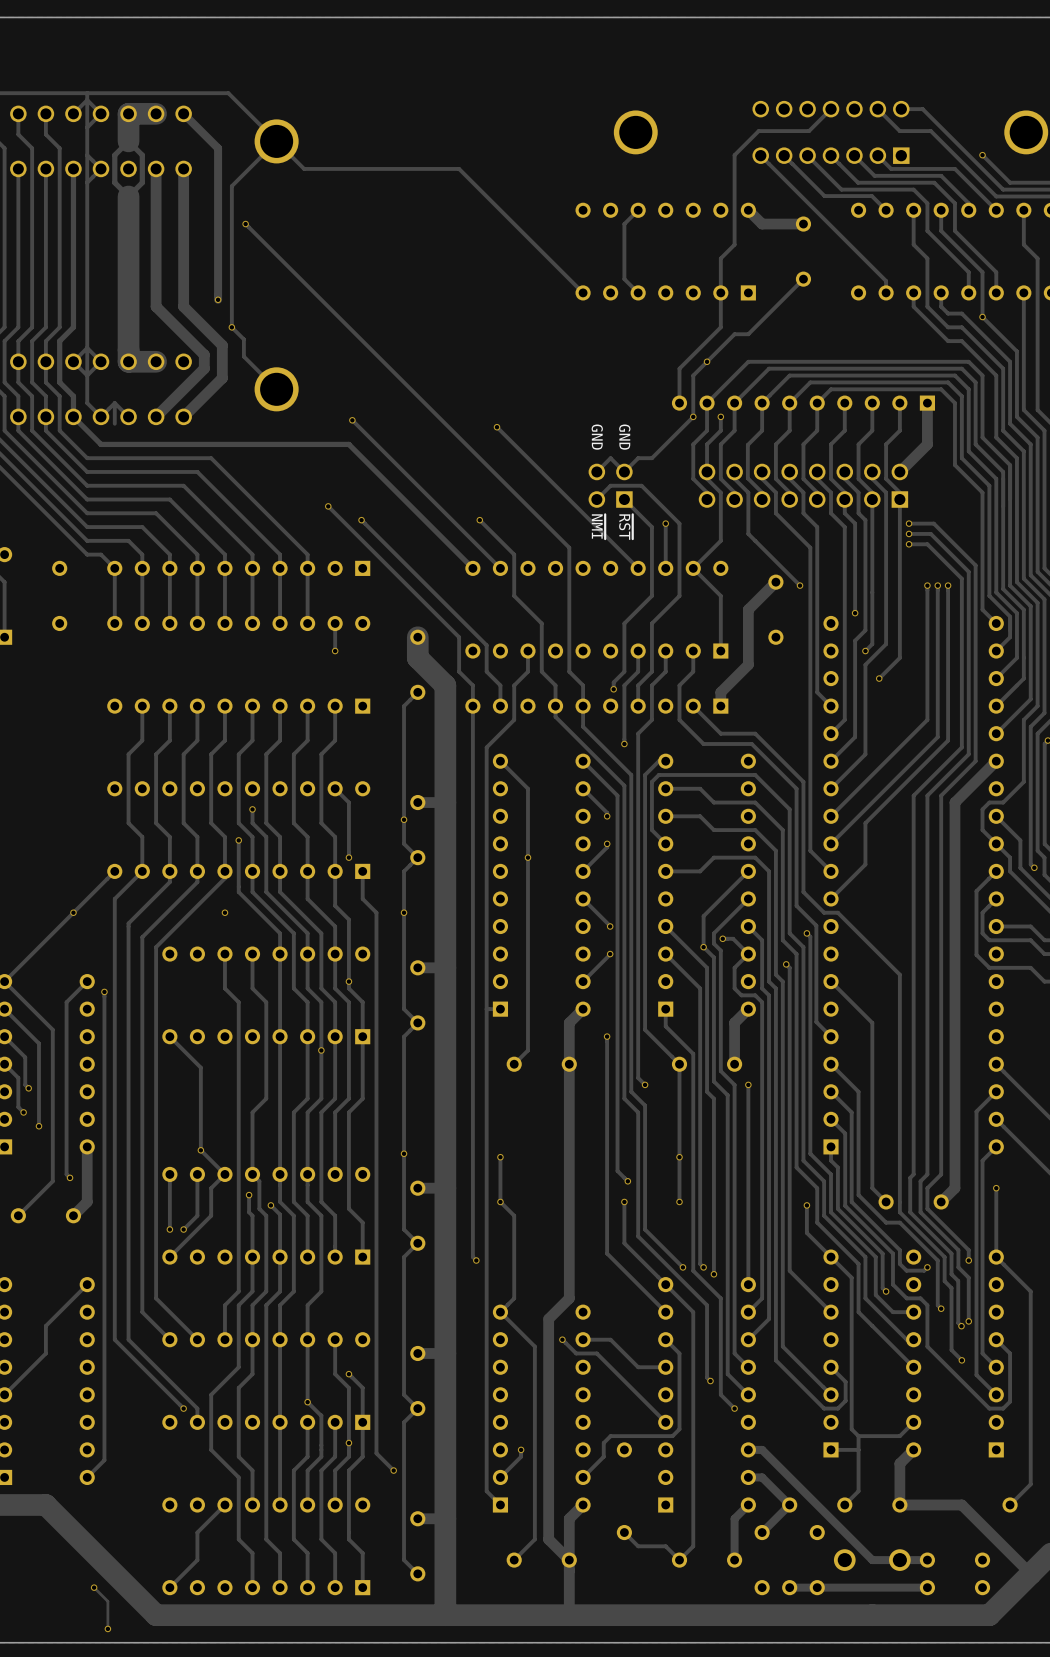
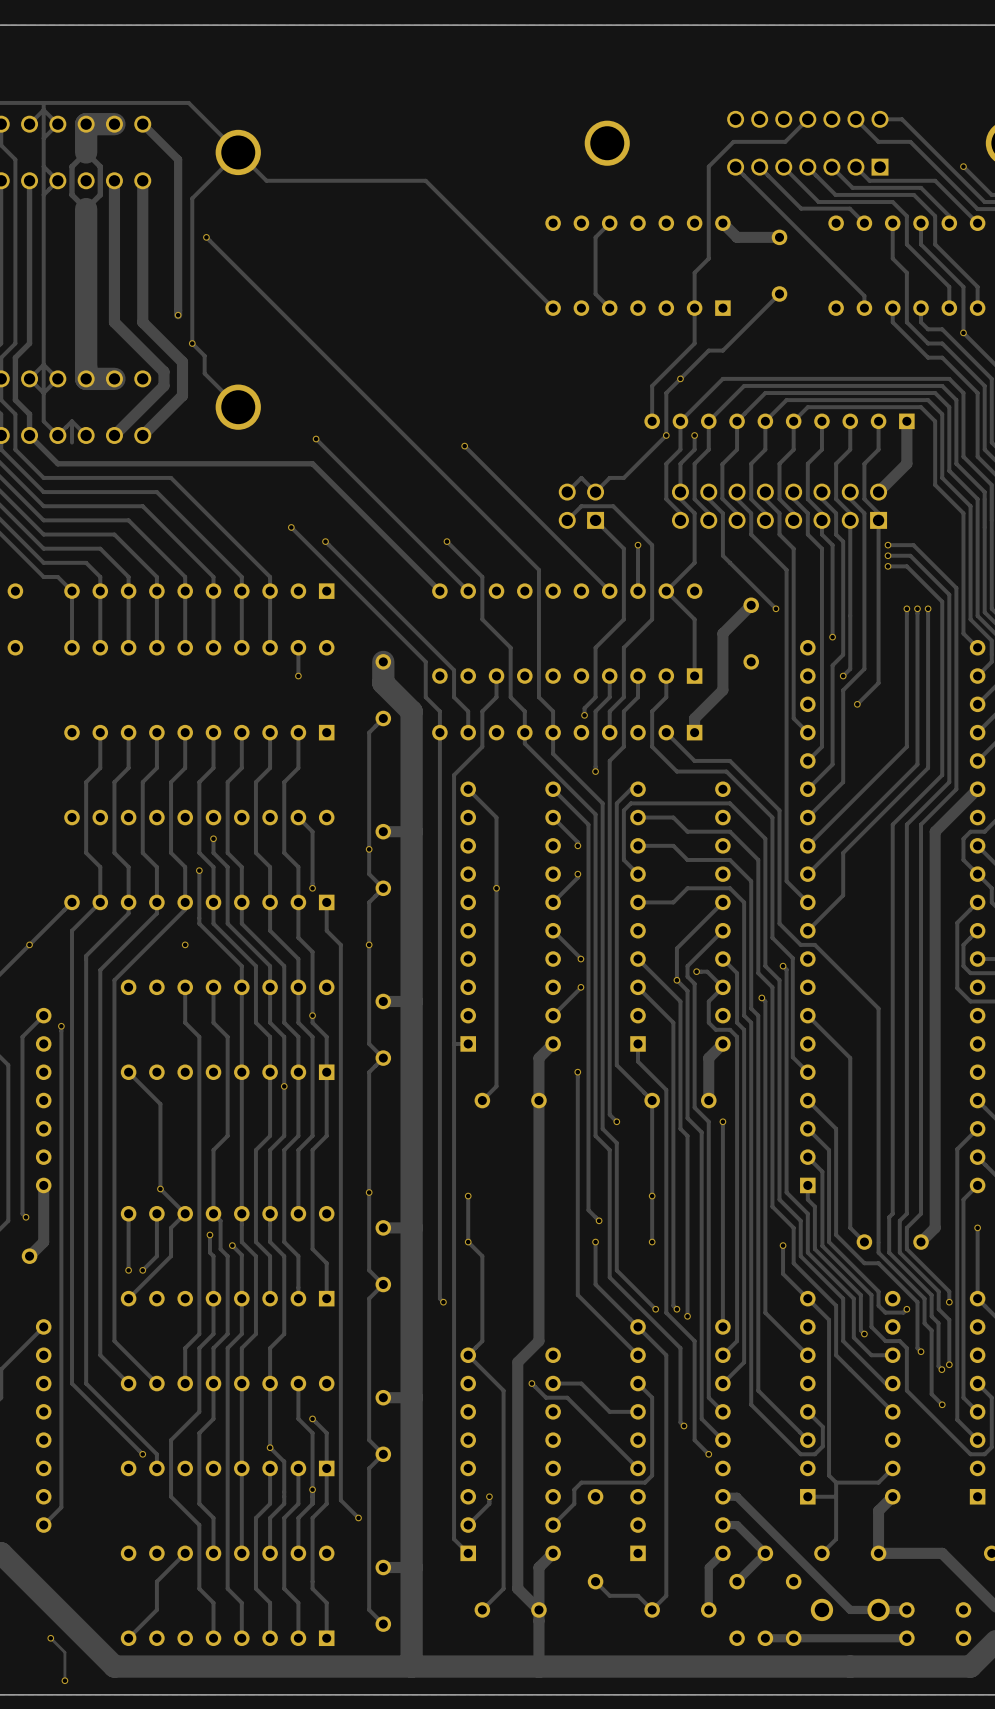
text: GND (597, 437) -> none
text: GND (624, 437) -> none
text: ~{NMI} (598, 526) -> none
text: ~{RST} (625, 527) -> none

